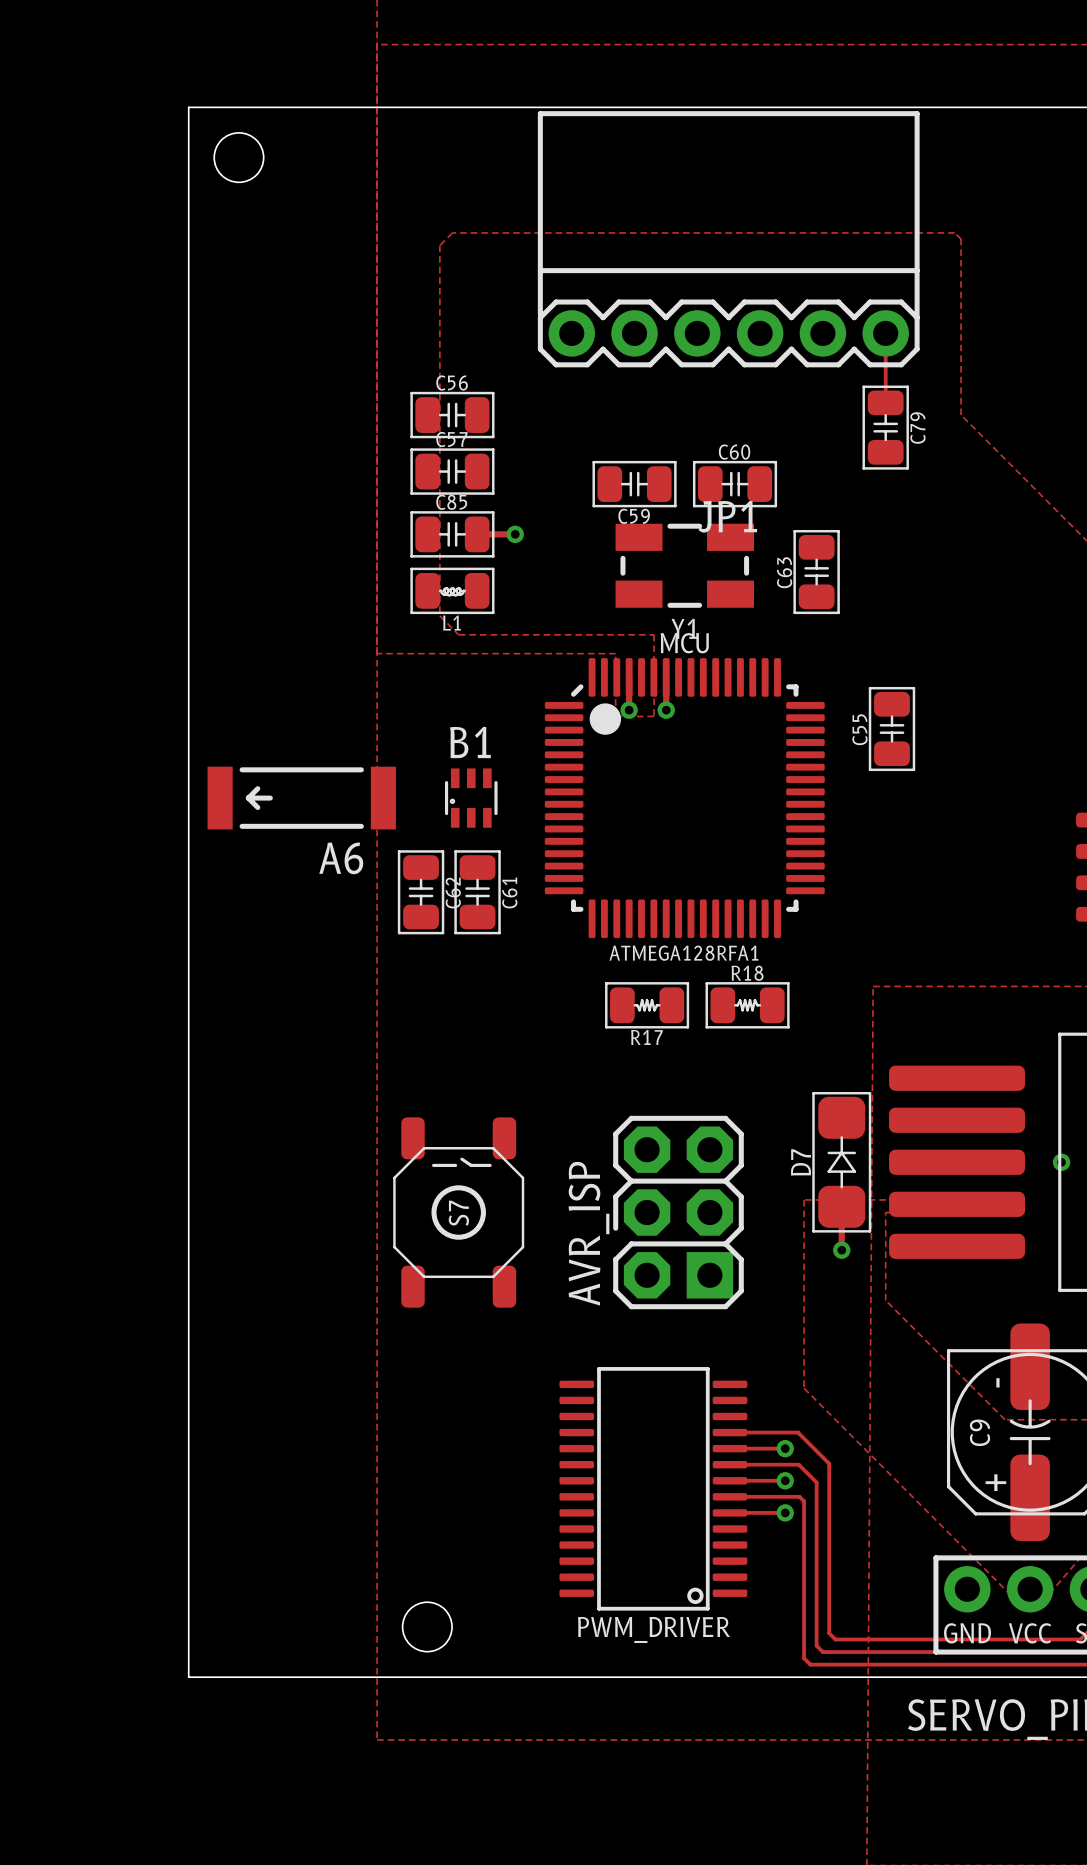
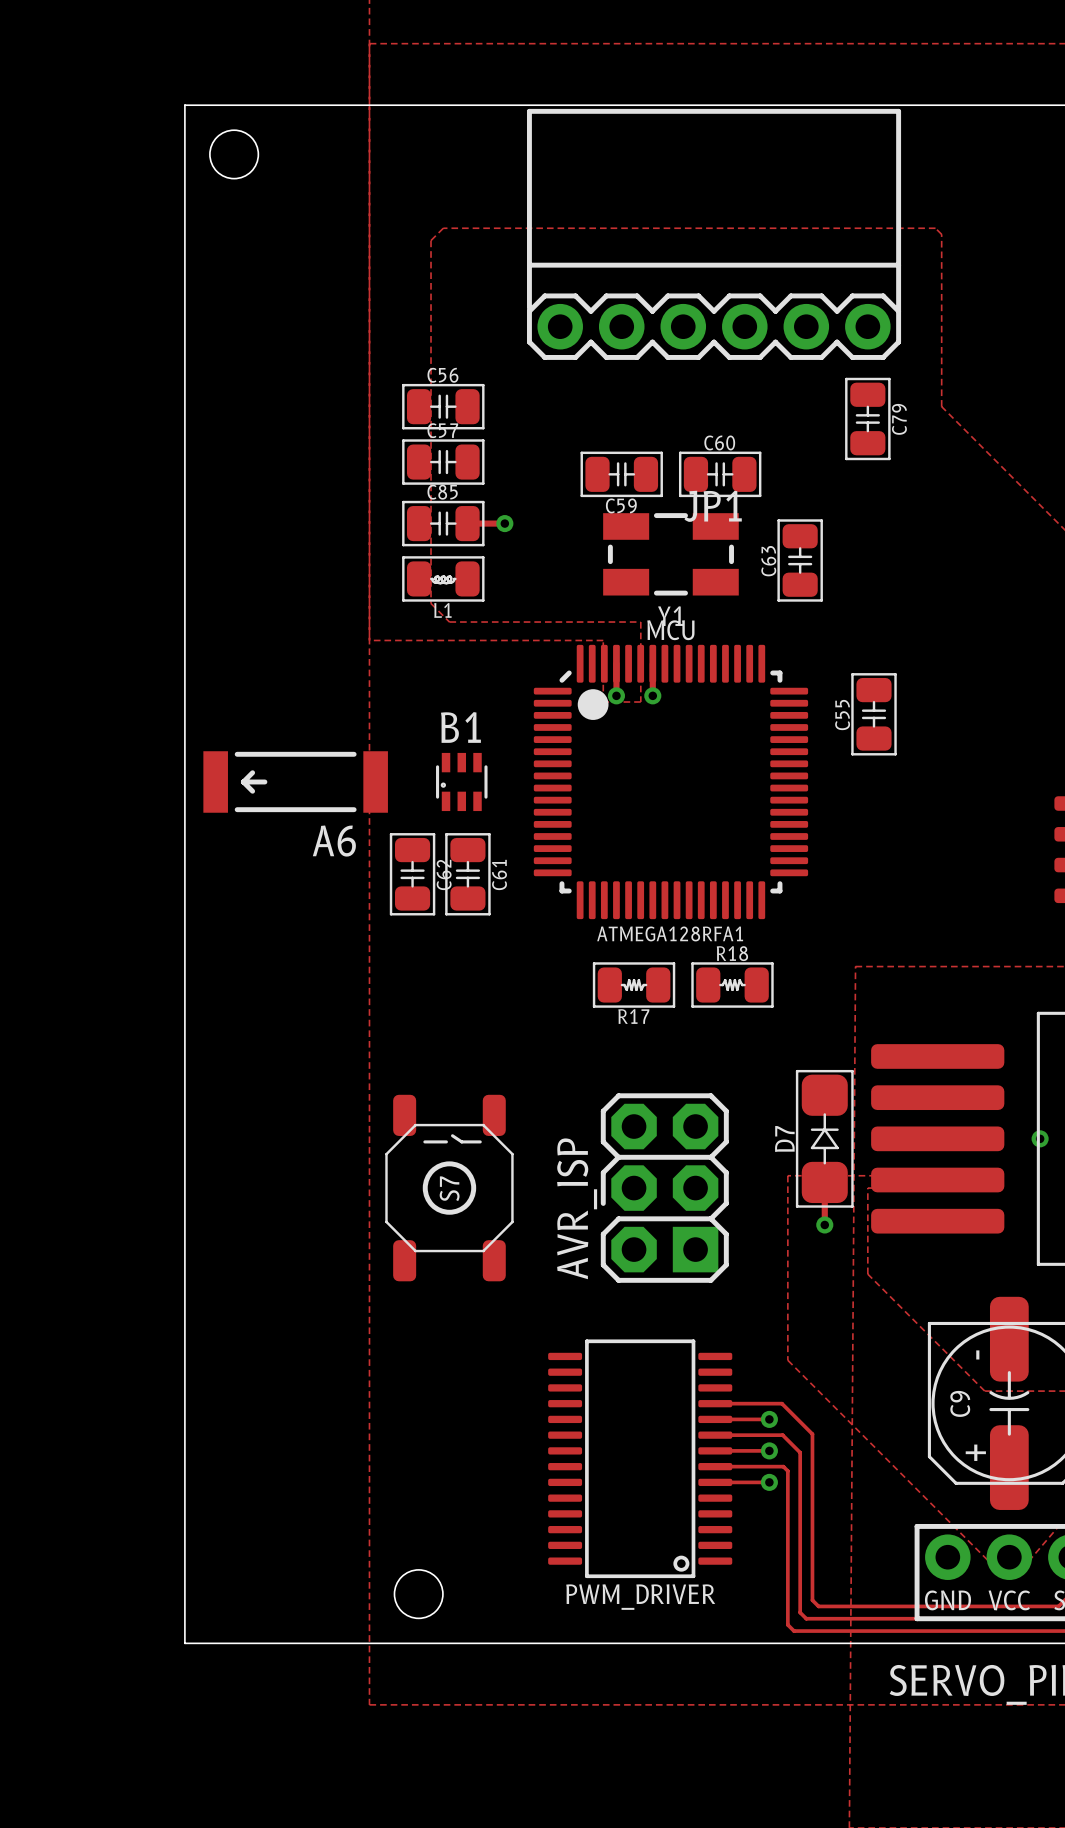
track: (885, 333) (885, 402) -> none

